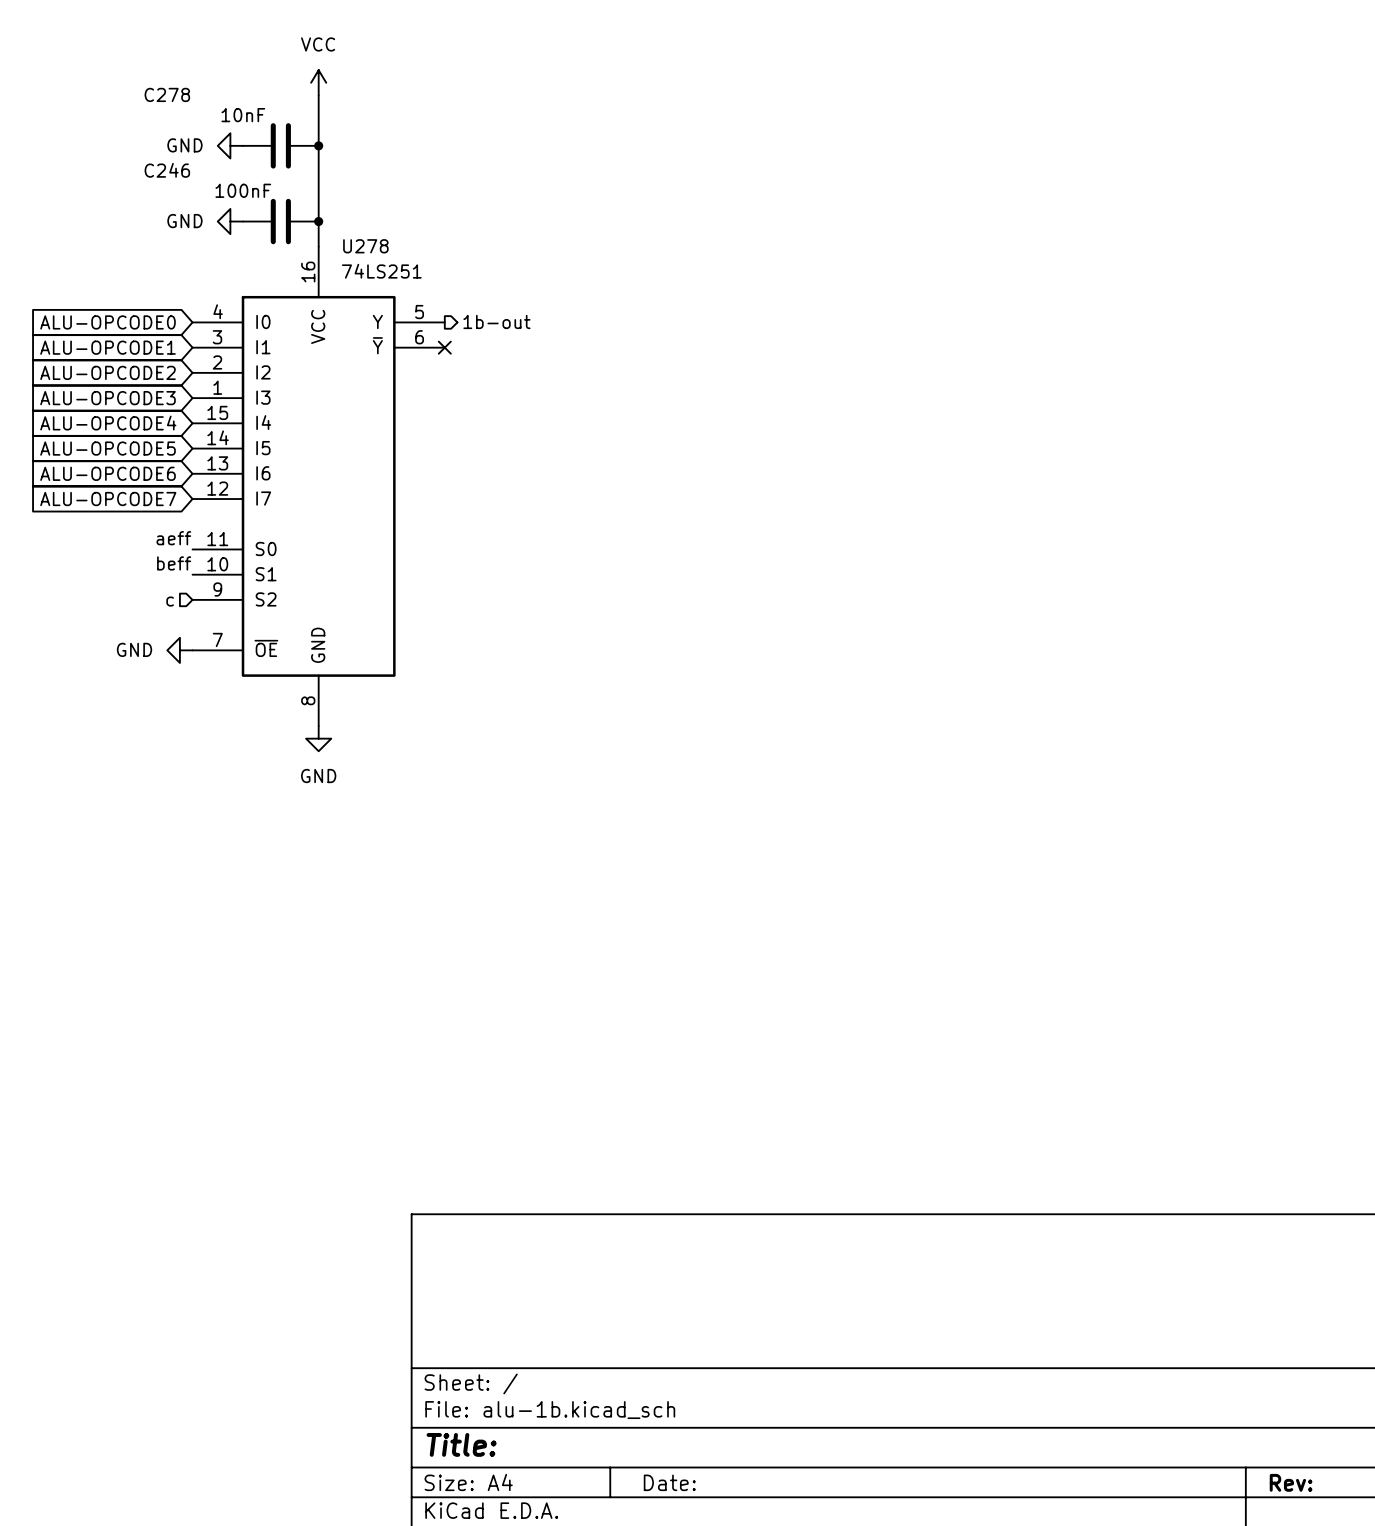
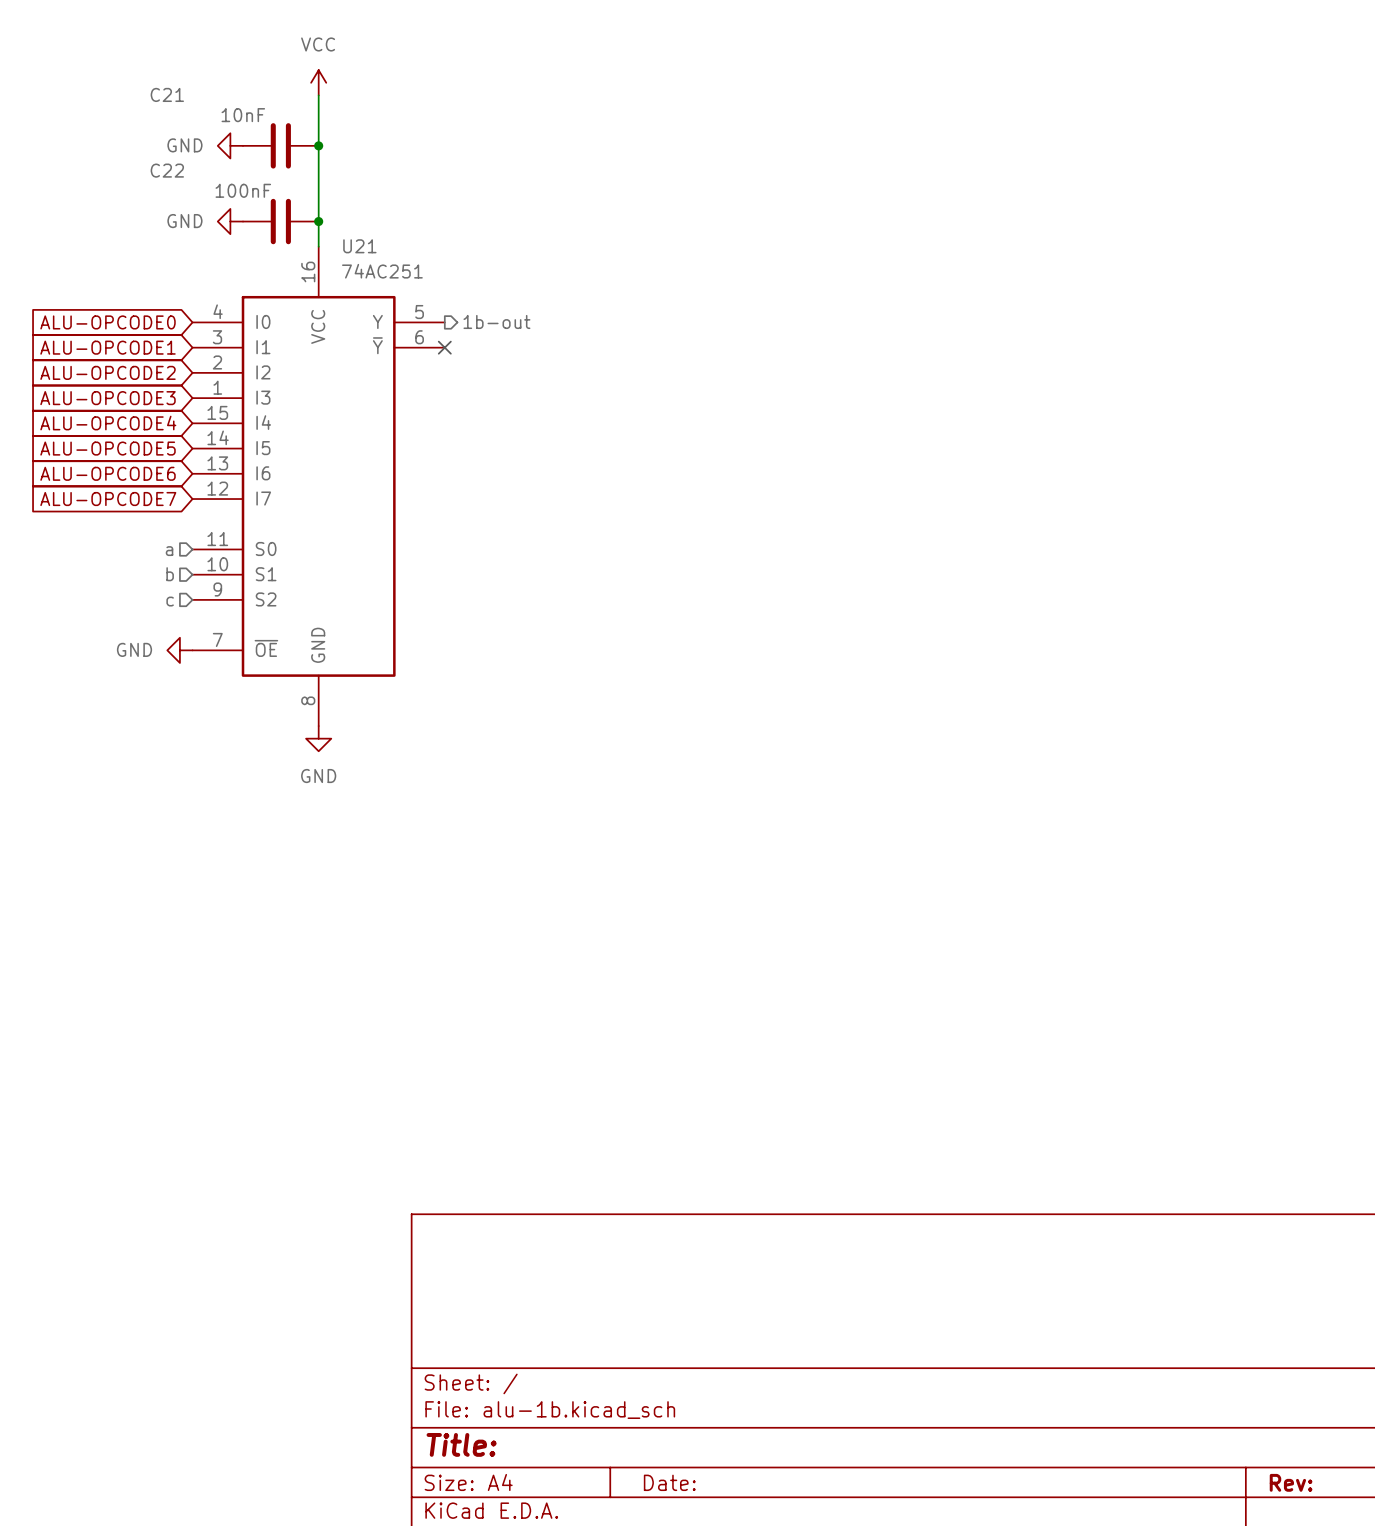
C278 name: C278 (167, 94) -> C21 (167, 94)
C246 name: C246 (167, 170) -> C22 (167, 170)
U278 name: U278 (365, 246) -> U21 (359, 246)
U278 value: 74LS251 (381, 271) -> 74AC251 (382, 271)
label: aeff (173, 538) -> none
hierarchical label: none -> a (169, 551)
label: beff (174, 563) -> none
hierarchical label: none -> b (170, 574)

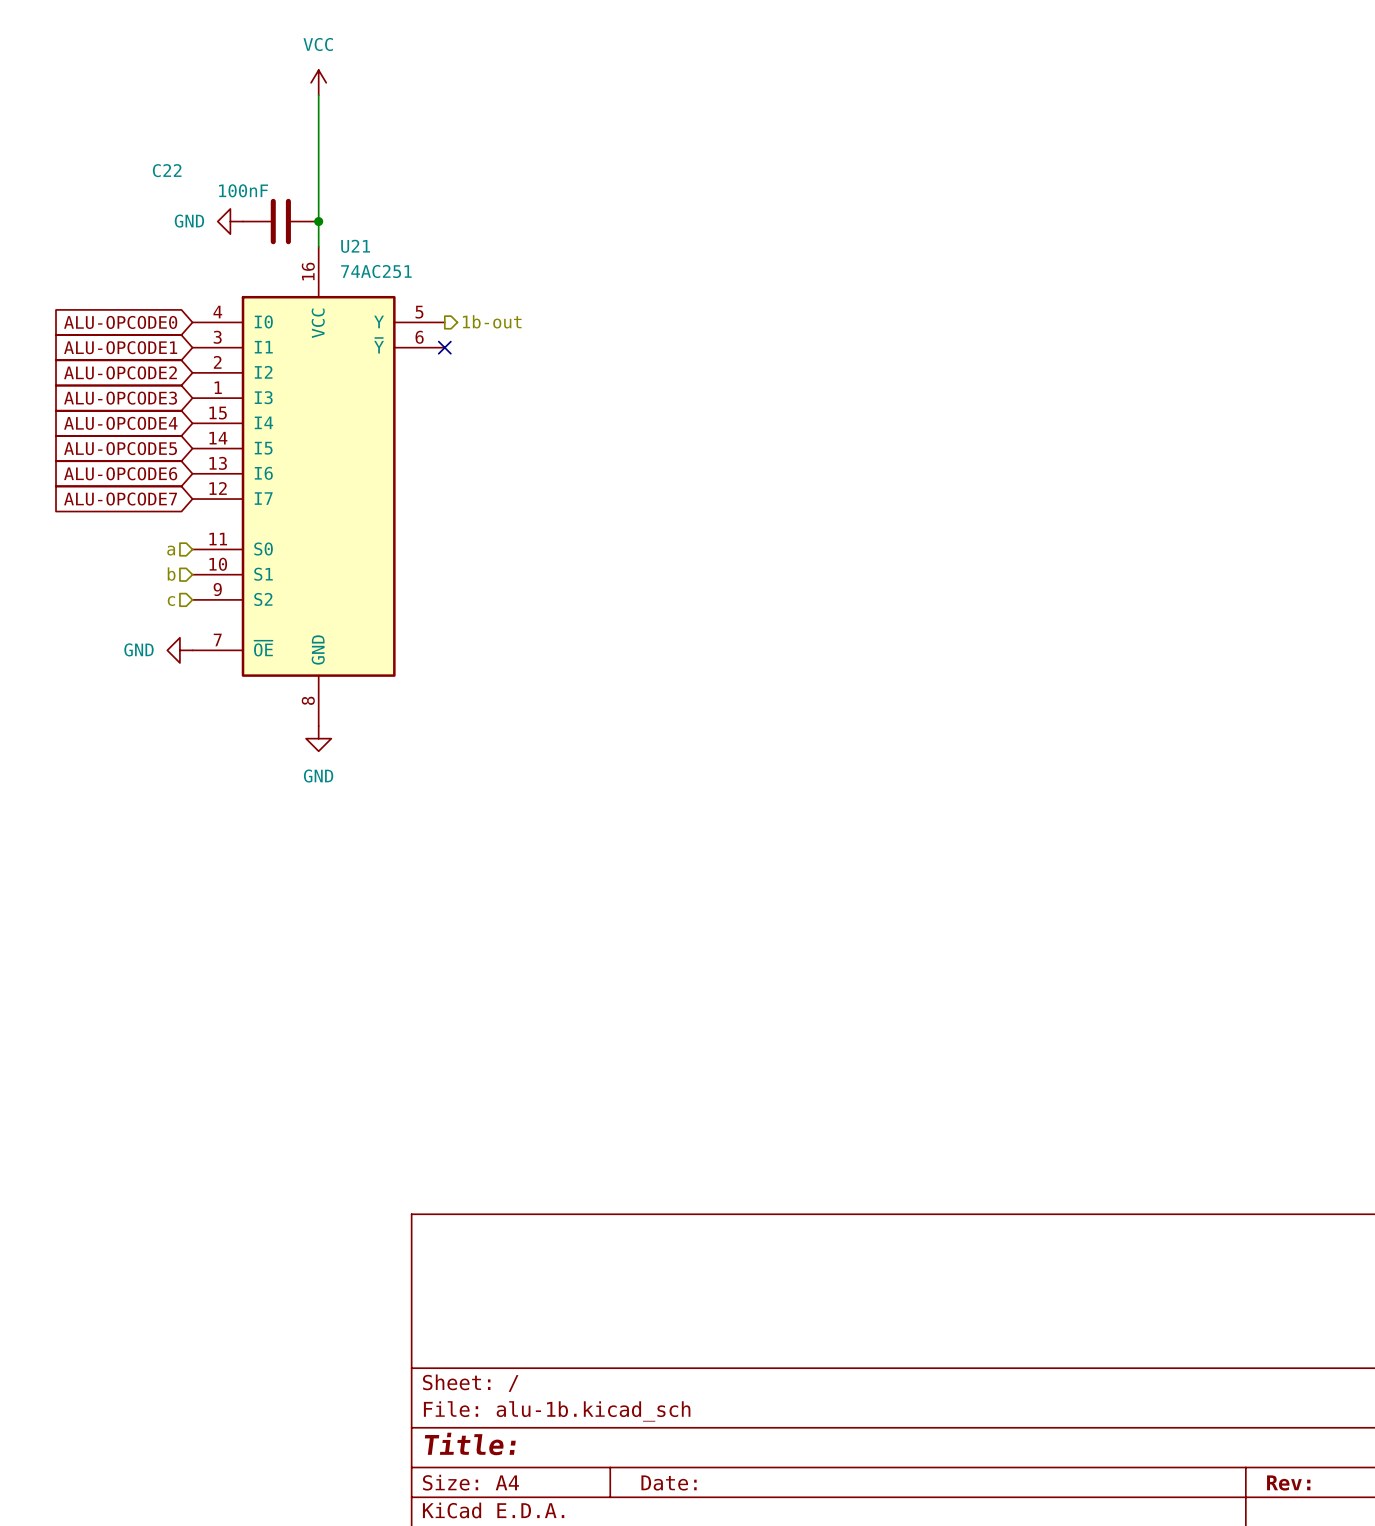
power symbol: GND (230, 145) -> none
C21: 10nF (280, 145) -> none
junction: (318, 145) -> none

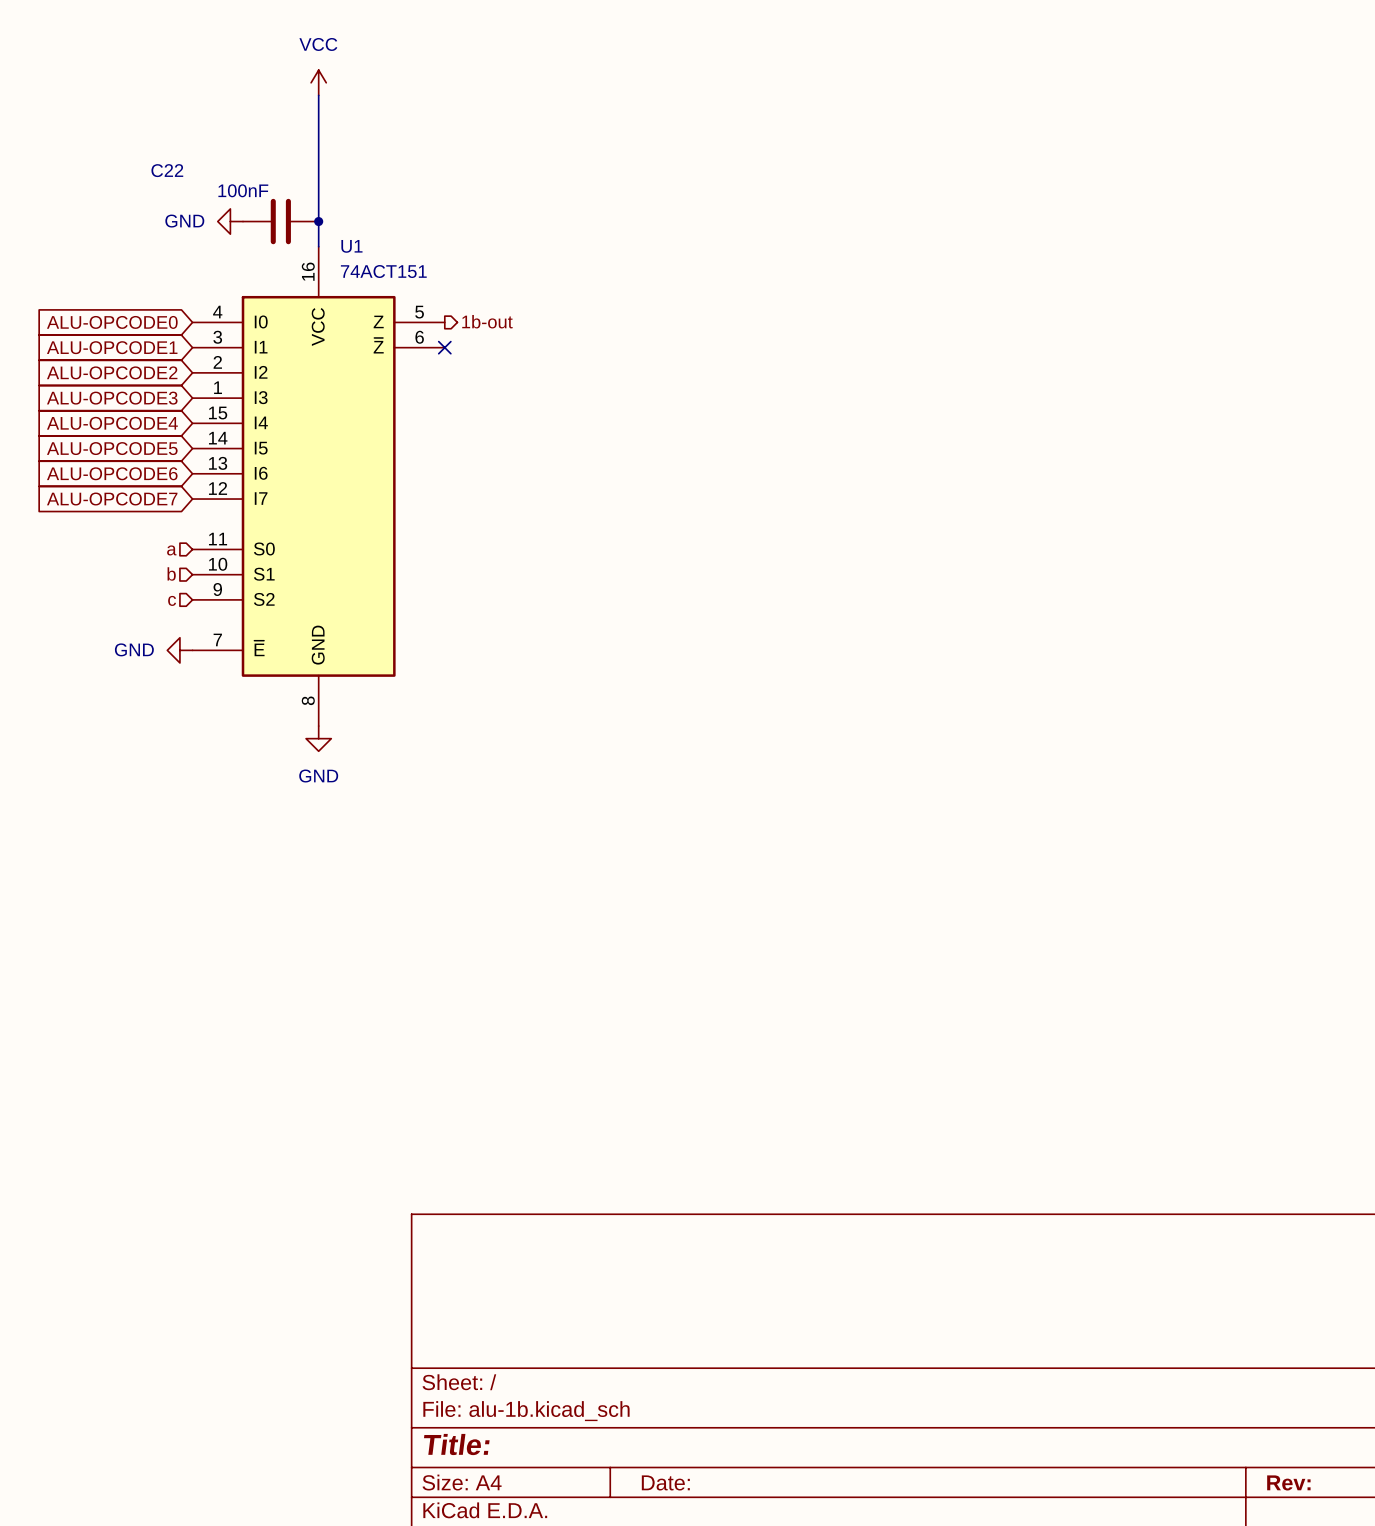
U21 name: U21 (355, 246) -> U1 (351, 246)
U21 value: 74AC251 (376, 271) -> 74ACT151 (383, 271)
U21 pin name: Y (379, 321) -> Z (378, 321)
U21 pin name: ~{Y} (379, 345) -> ~{Z} (378, 345)
U21 pin name: ~{OE} (263, 648) -> ~{E} (259, 648)

